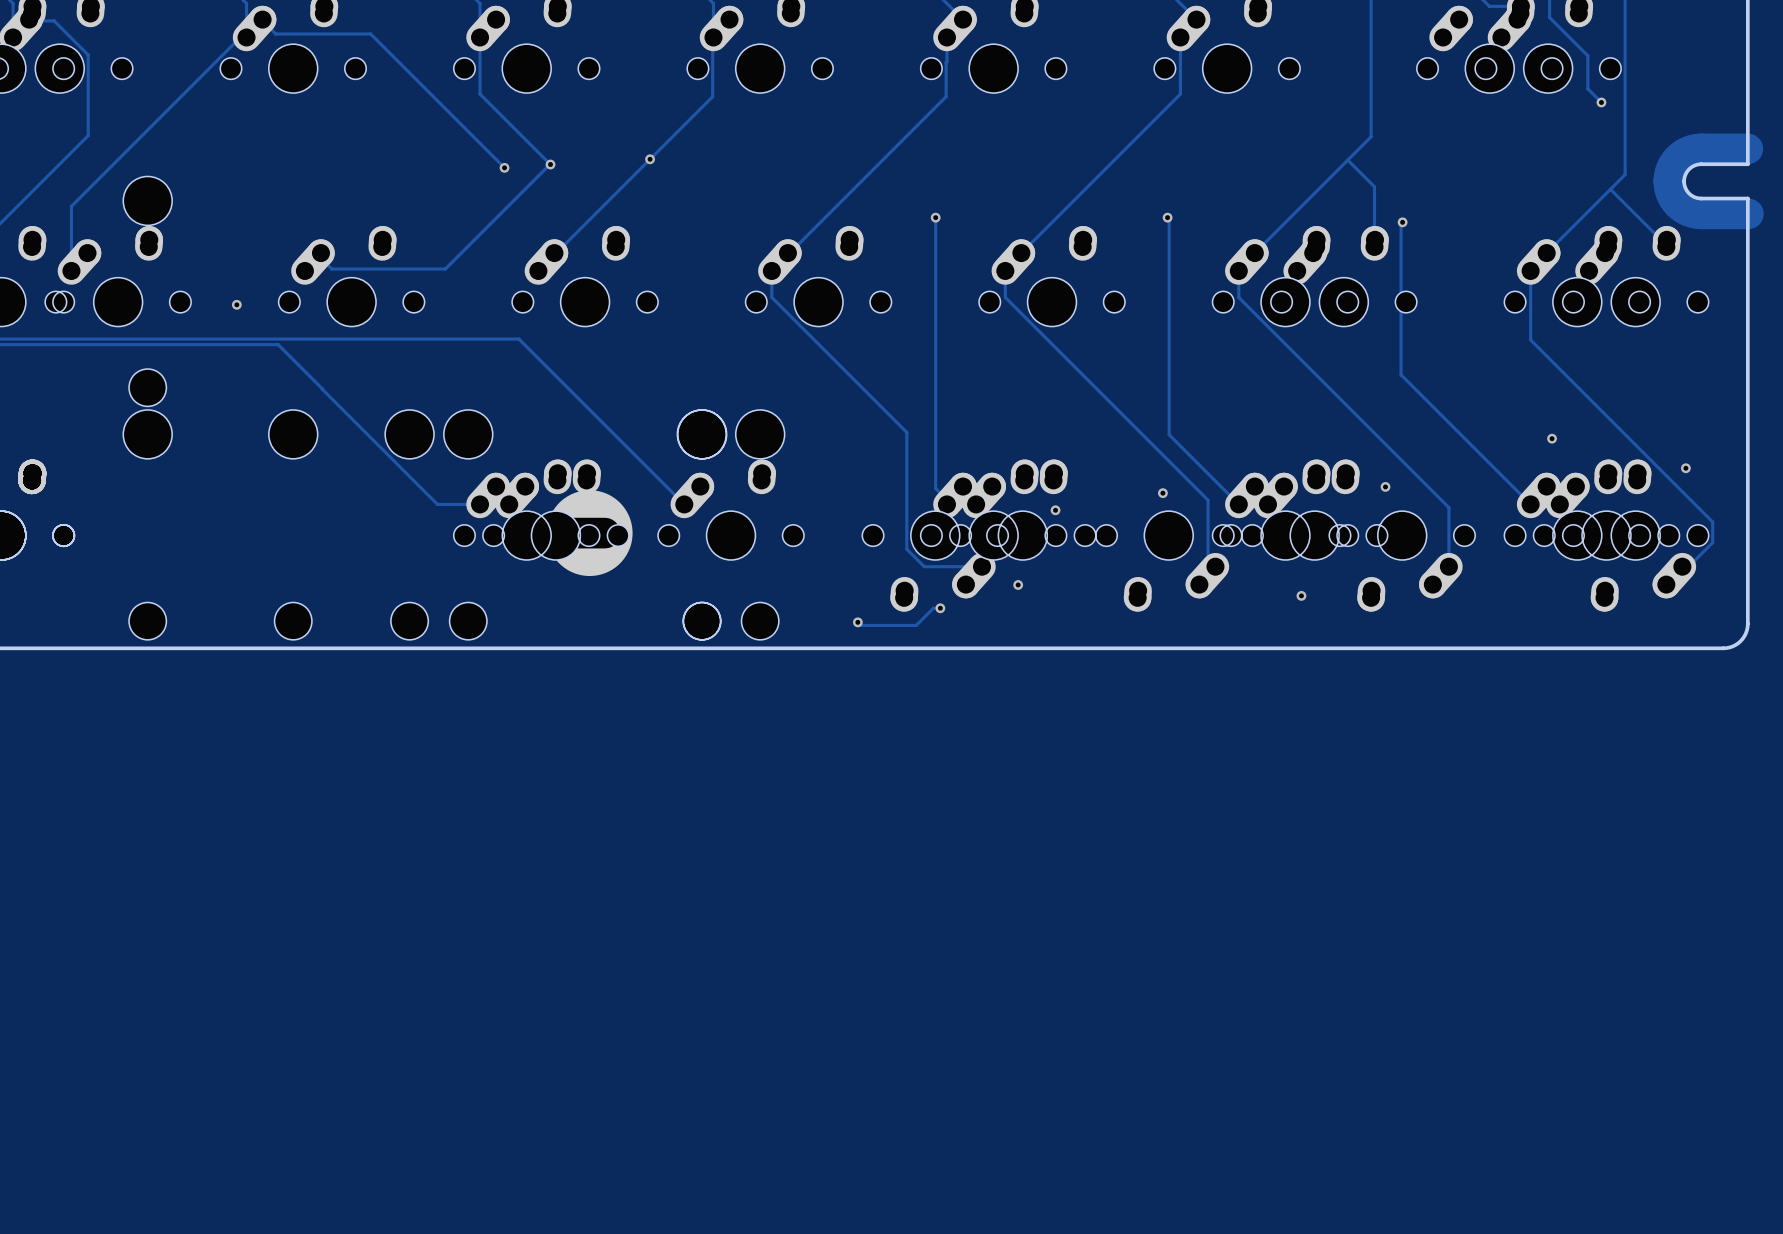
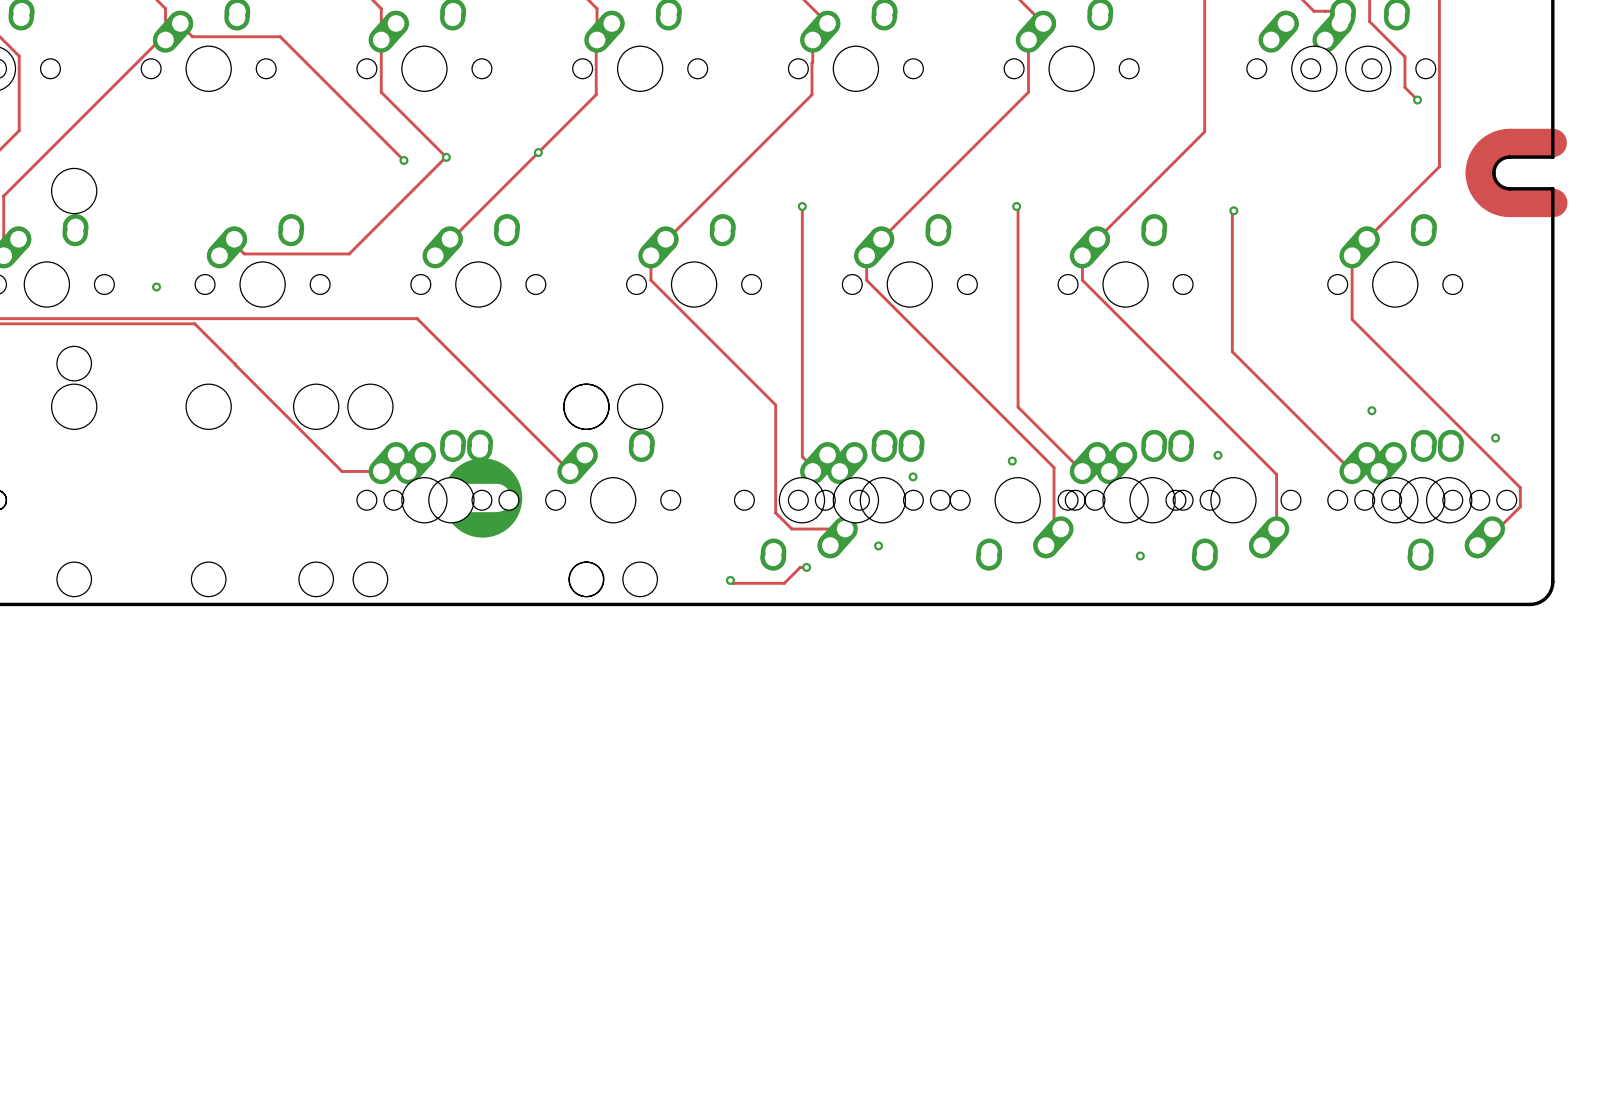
track: (1347, 160) (1374, 186) (1374, 246) -> none
track: (1610, 189) (1666, 246) -> none
part: (1343, 276) -> none
part: (1635, 276) -> none

